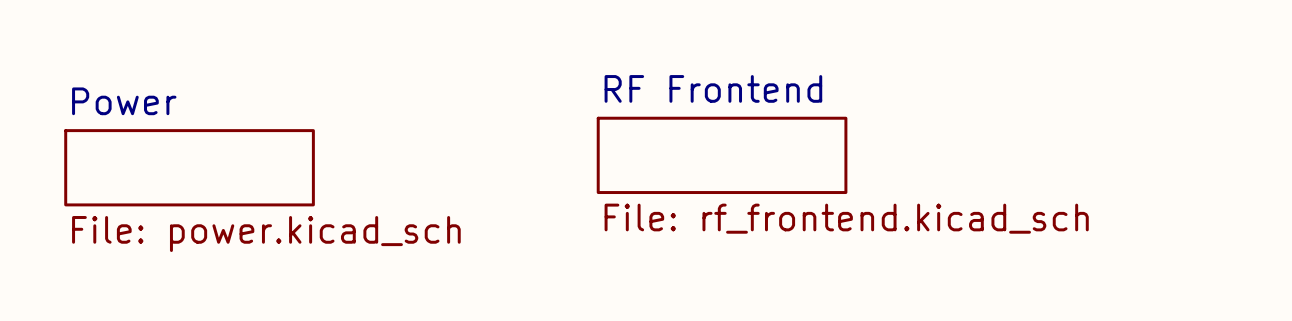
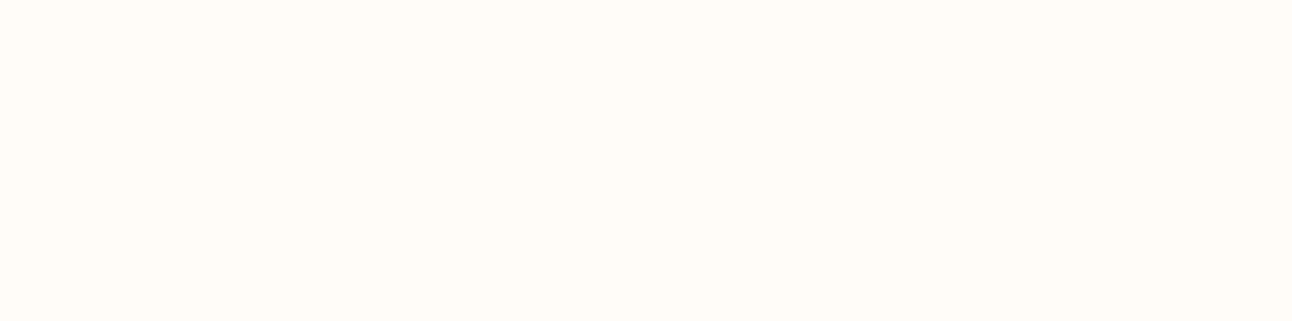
sheet RF Frontend: File: rf_frontend.kicad_sch (722, 155) -> none
sheet Power: File: power.kicad_sch (189, 167) -> none

